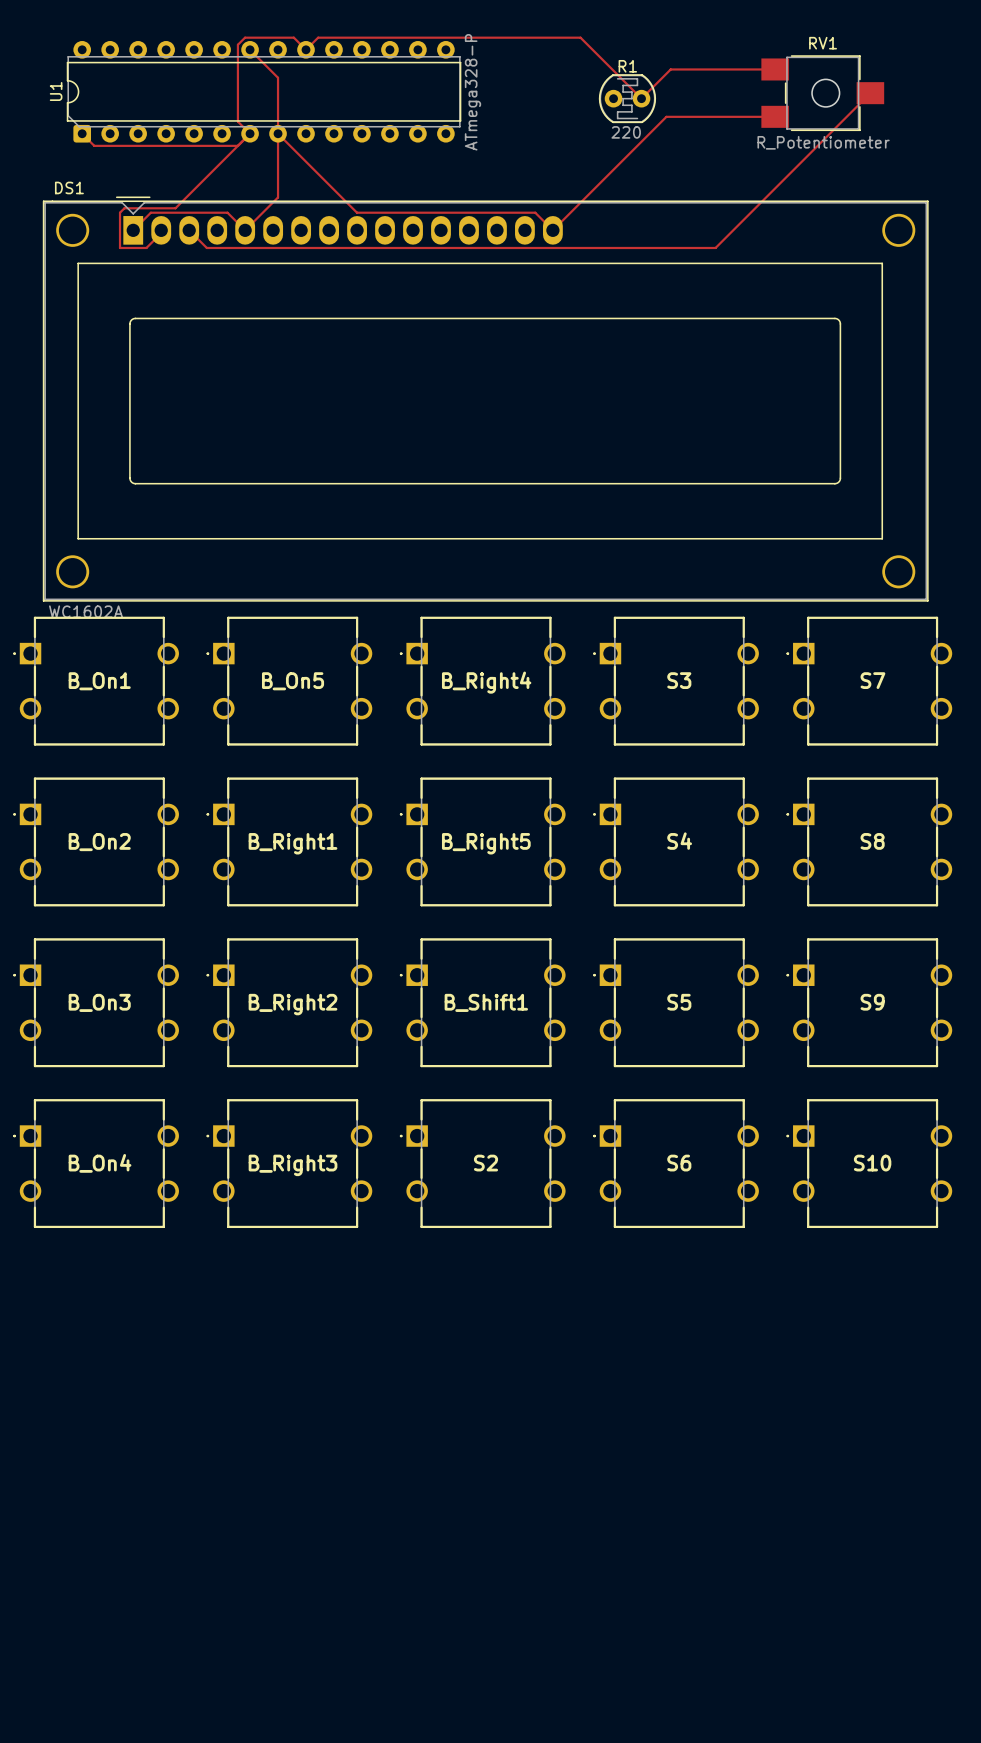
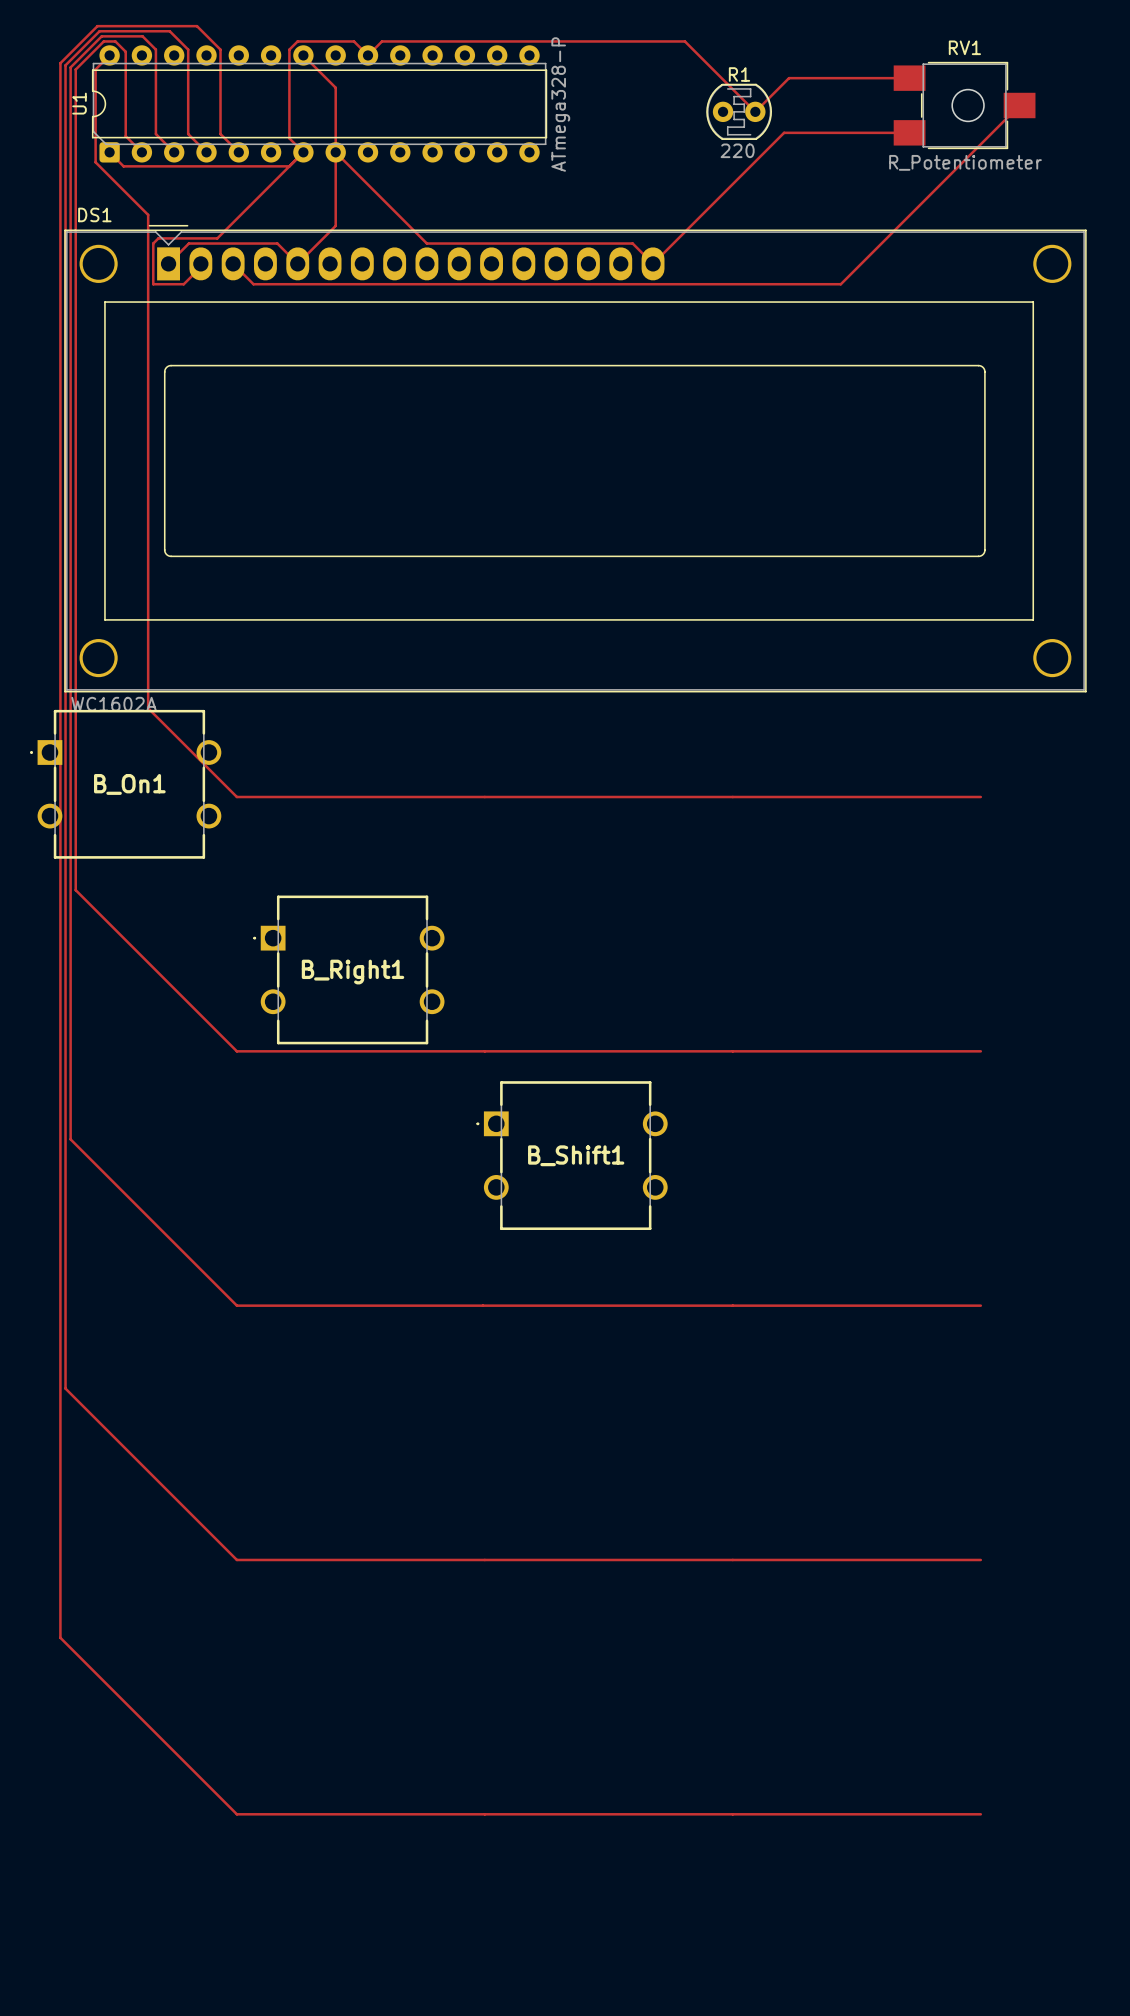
track: none -> (109, 55) (95, 69) (95, 162) (148, 214) (148, 708) (236, 797) (980, 797)
track: none -> (141, 152) (125, 136) (125, 51) (115, 41) (103, 41) (75, 69) (75, 890) (236, 1051) (980, 1051)
track: none -> (174, 152) (155, 134) (155, 49) (142, 36) (101, 36) (70, 67) (70, 1139) (236, 1305) (980, 1305)
track: none -> (206, 152) (188, 134) (188, 49) (169, 31) (99, 31) (65, 65) (65, 1388) (236, 1559) (980, 1559)
track: none -> (238, 152) (220, 134) (220, 49) (197, 26) (97, 26) (60, 63) (60, 1637) (236, 1814) (980, 1814)
B_On5: (289, 681) -> none
B_Right4: (482, 681) -> none
S3: (676, 681) -> none
S7: (869, 681) -> none
B_On2: (96, 841) -> none
B_Right5: (482, 841) -> none
S4: (676, 841) -> none
S8: (869, 841) -> none
B_On3: (96, 1002) -> none
B_Right2: (289, 1002) -> none
S5: (676, 1002) -> none
S9: (869, 1002) -> none
B_On4: (96, 1163) -> none
B_Right3: (289, 1163) -> none
S2: (482, 1163) -> none
S6: (676, 1163) -> none
S10: (869, 1163) -> none

